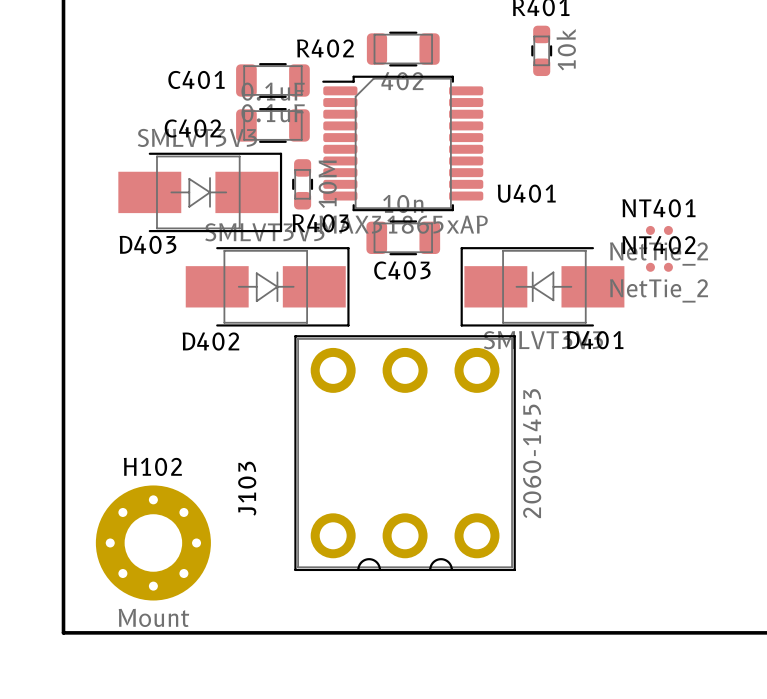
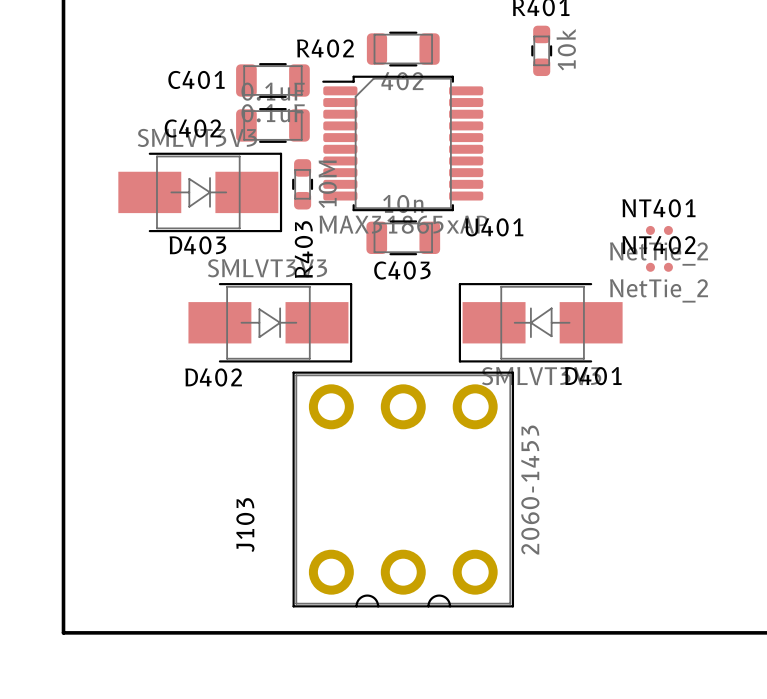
U401 name position: U401 (526, 193) -> U401 (494, 227)
R403 name rotation: 0° (320, 223) -> 90° counterclockwise (303, 249)
D403 name position: D403 (148, 244) -> D403 (197, 245)
D402 position: (267, 286) -> (270, 322)
D401 position: (542, 286) -> (540, 322)
J103 position: (405, 453) -> (403, 489)
H102: Mount (153, 542) -> none

